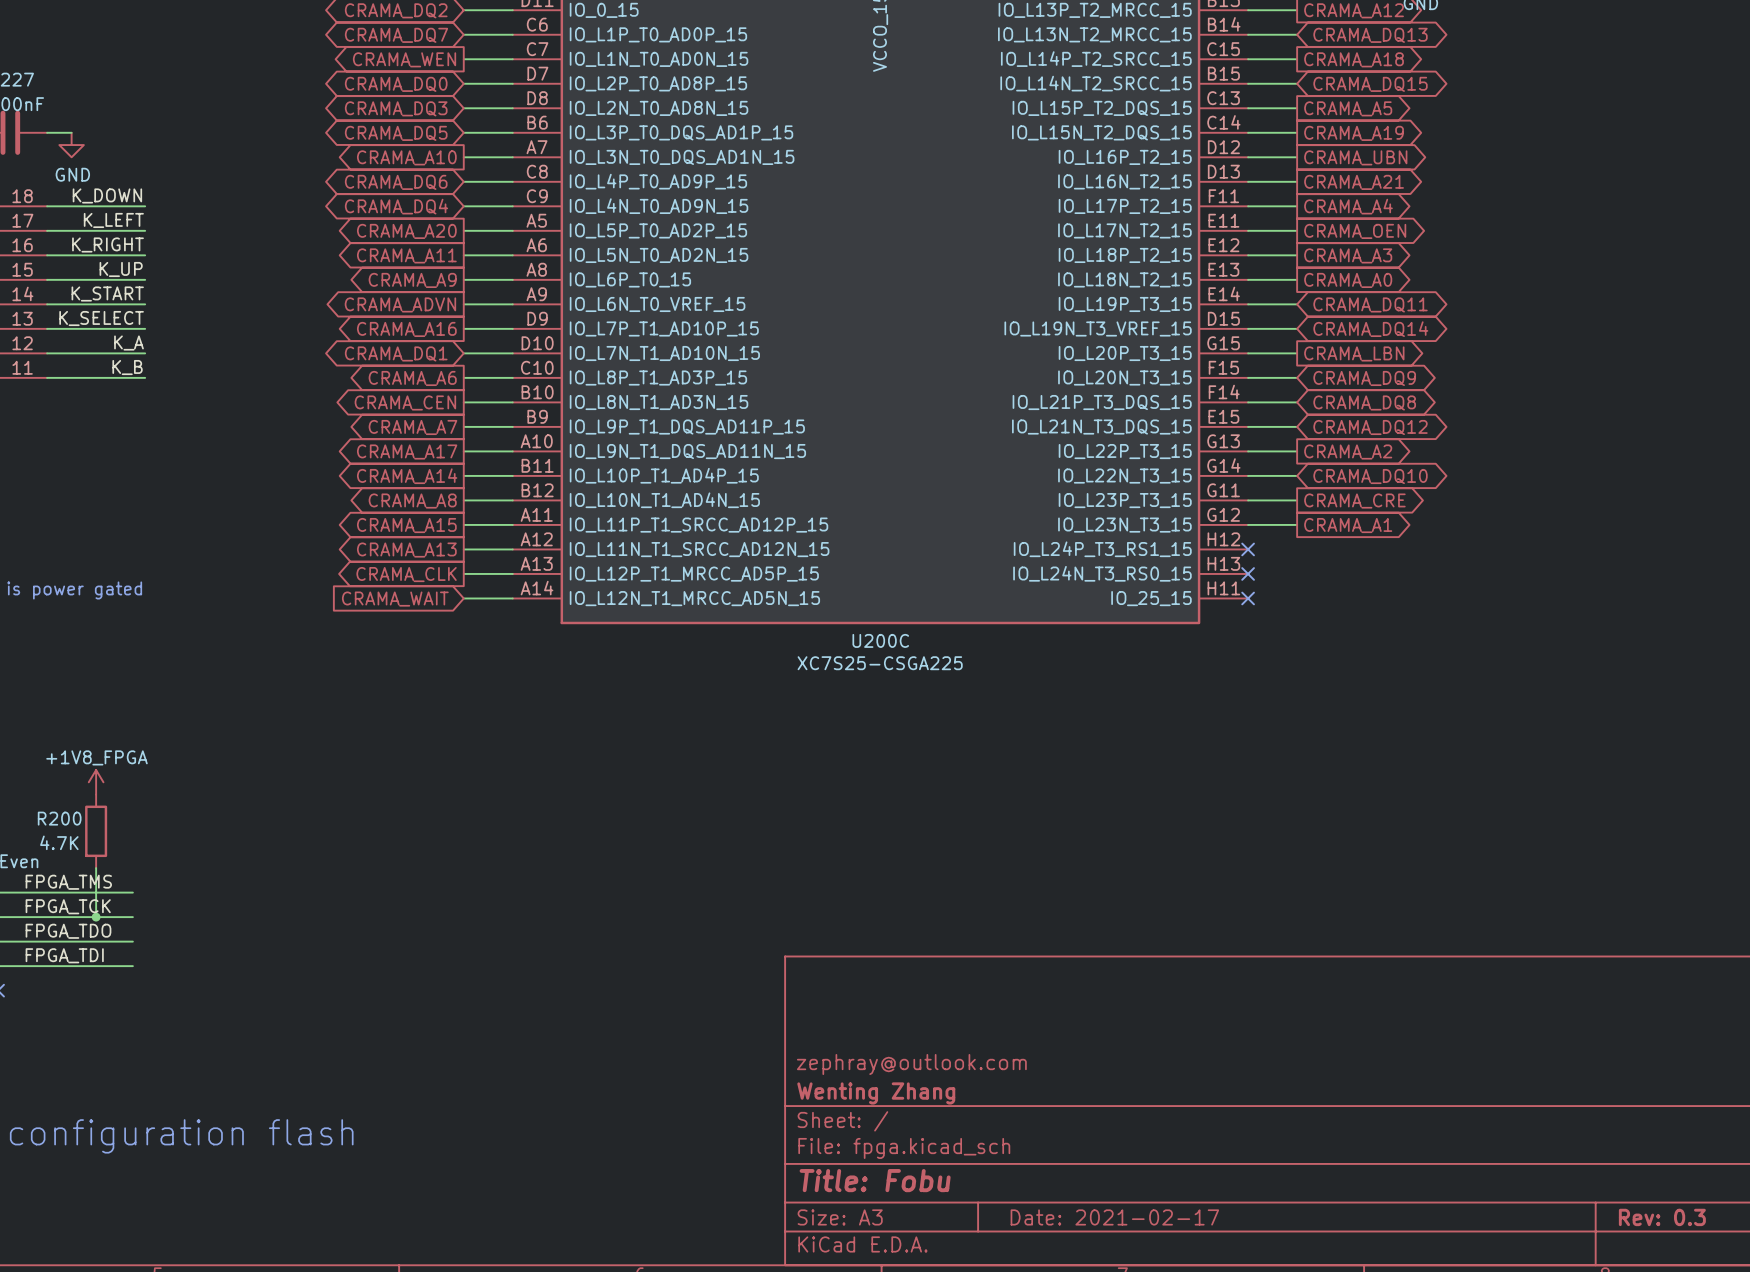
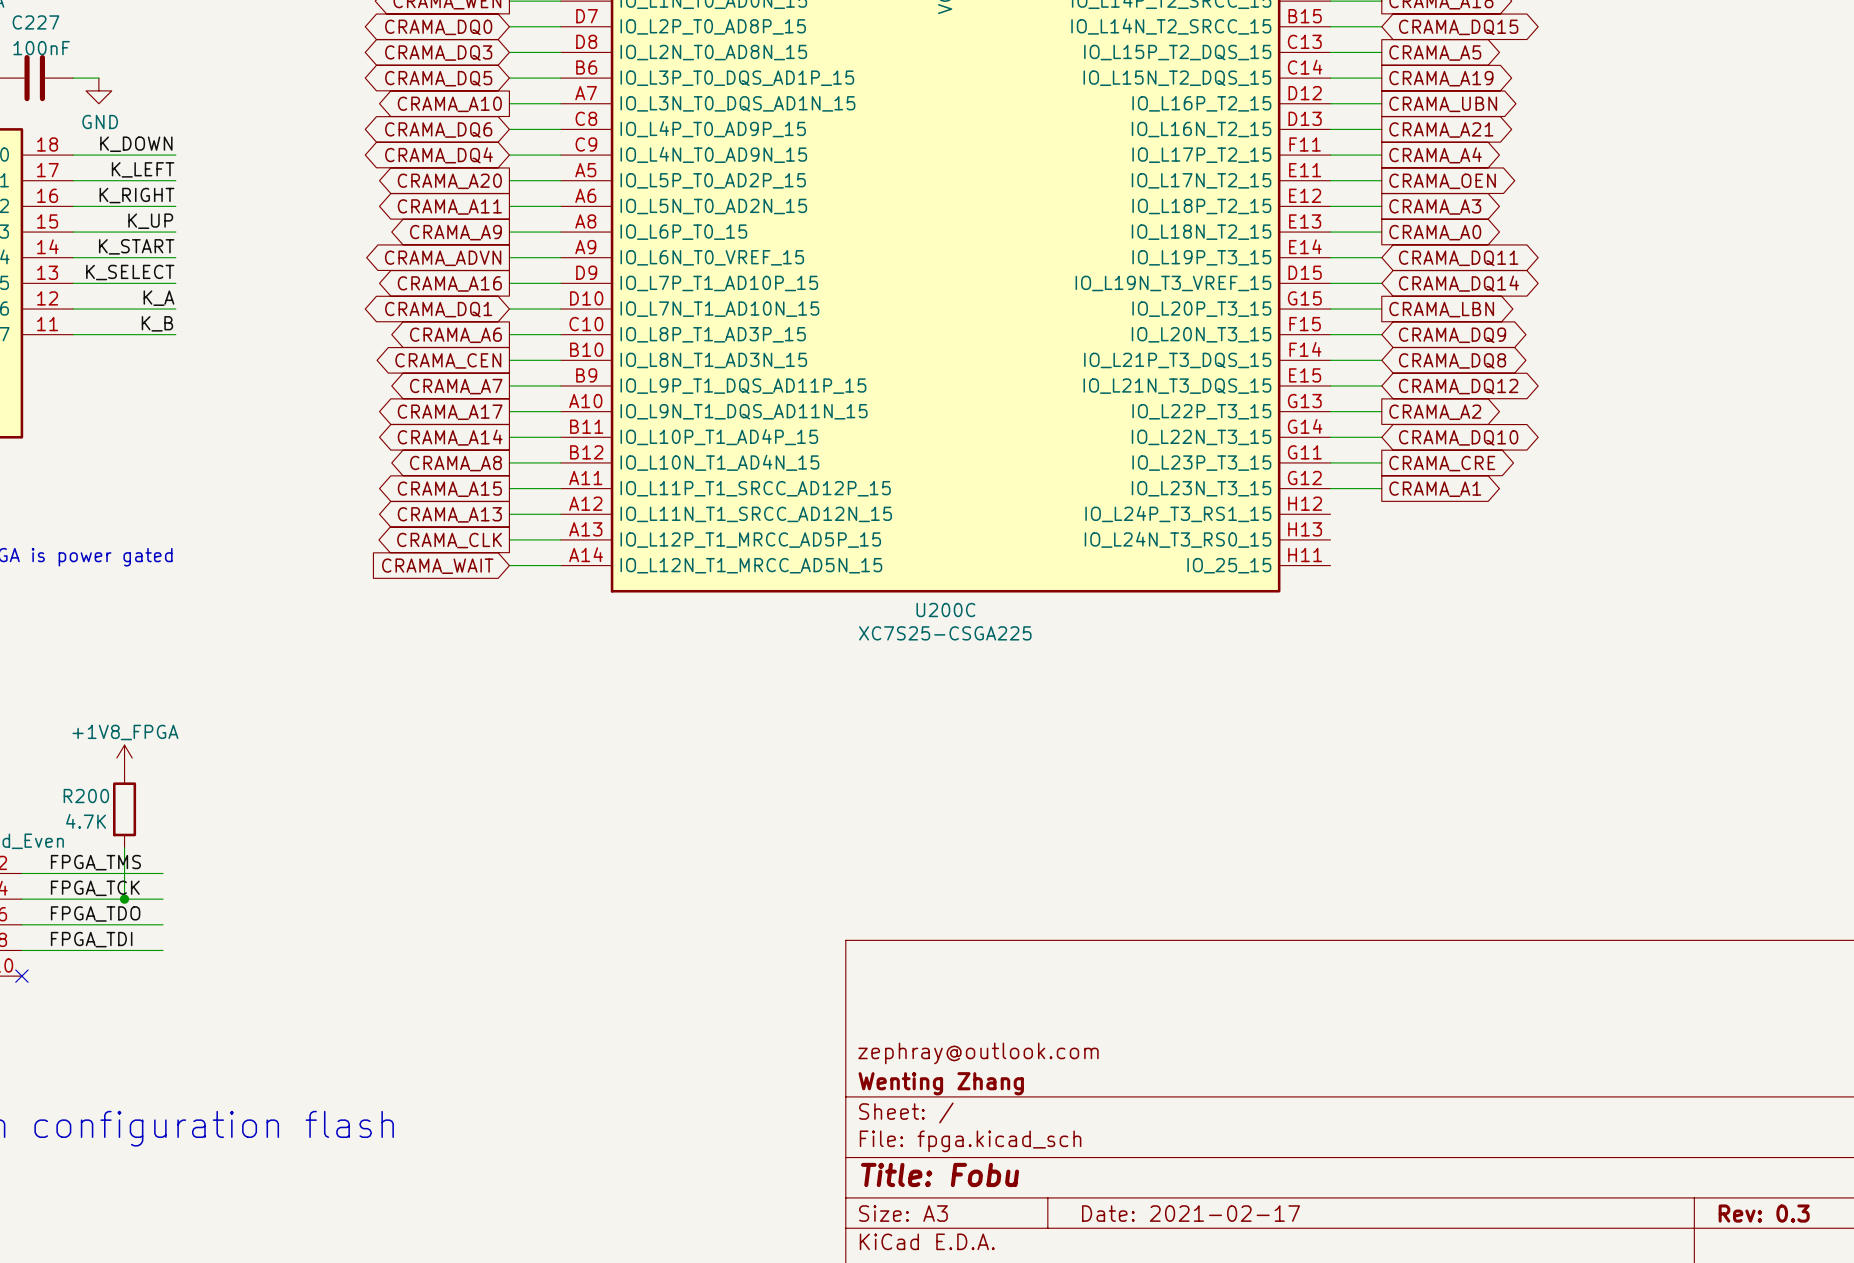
no-connect mark: (1248, 549) -> none
no-connect mark: (1248, 573) -> none
no-connect mark: (1248, 598) -> none

